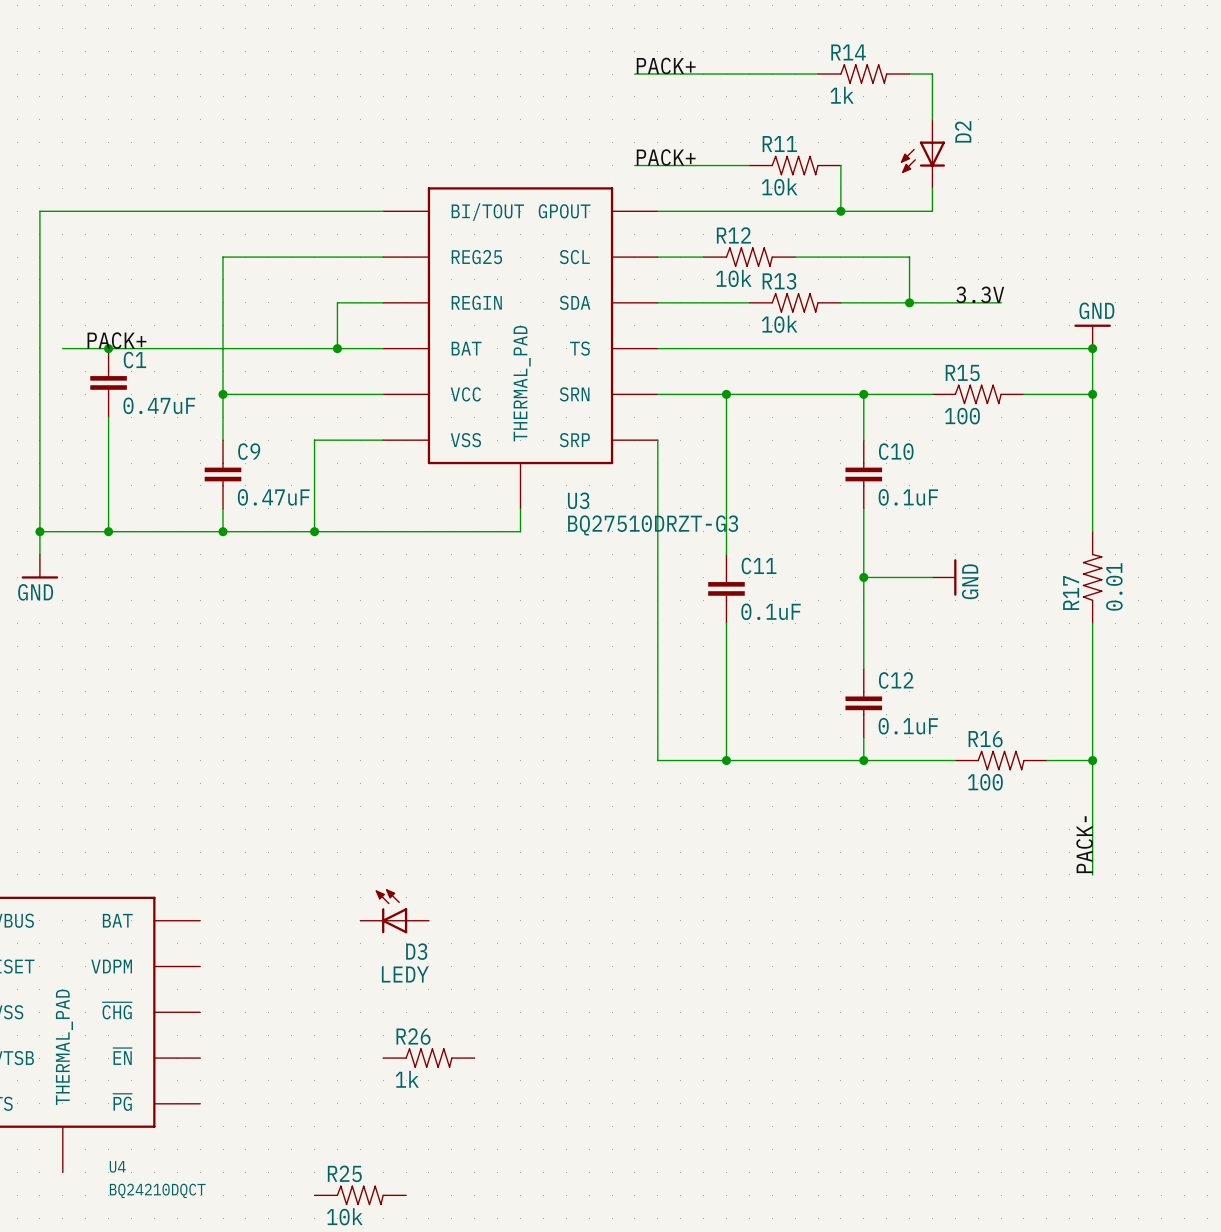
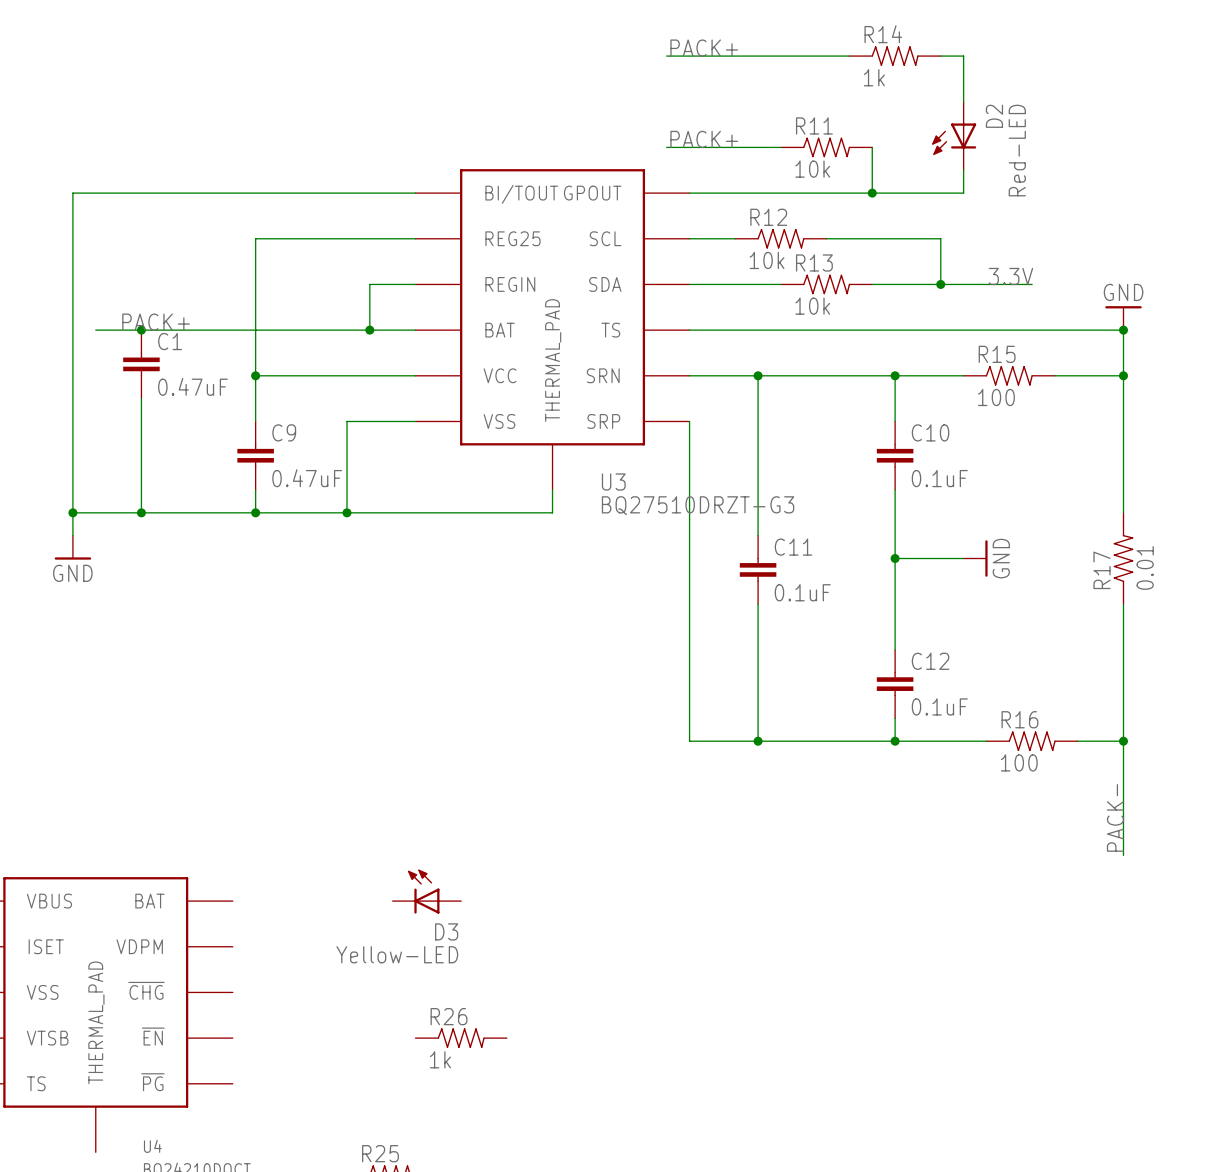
D2 value: none -> Red-LED (1017, 150)
D3 value: LEDY (405, 974) -> Yellow-LED (397, 954)

